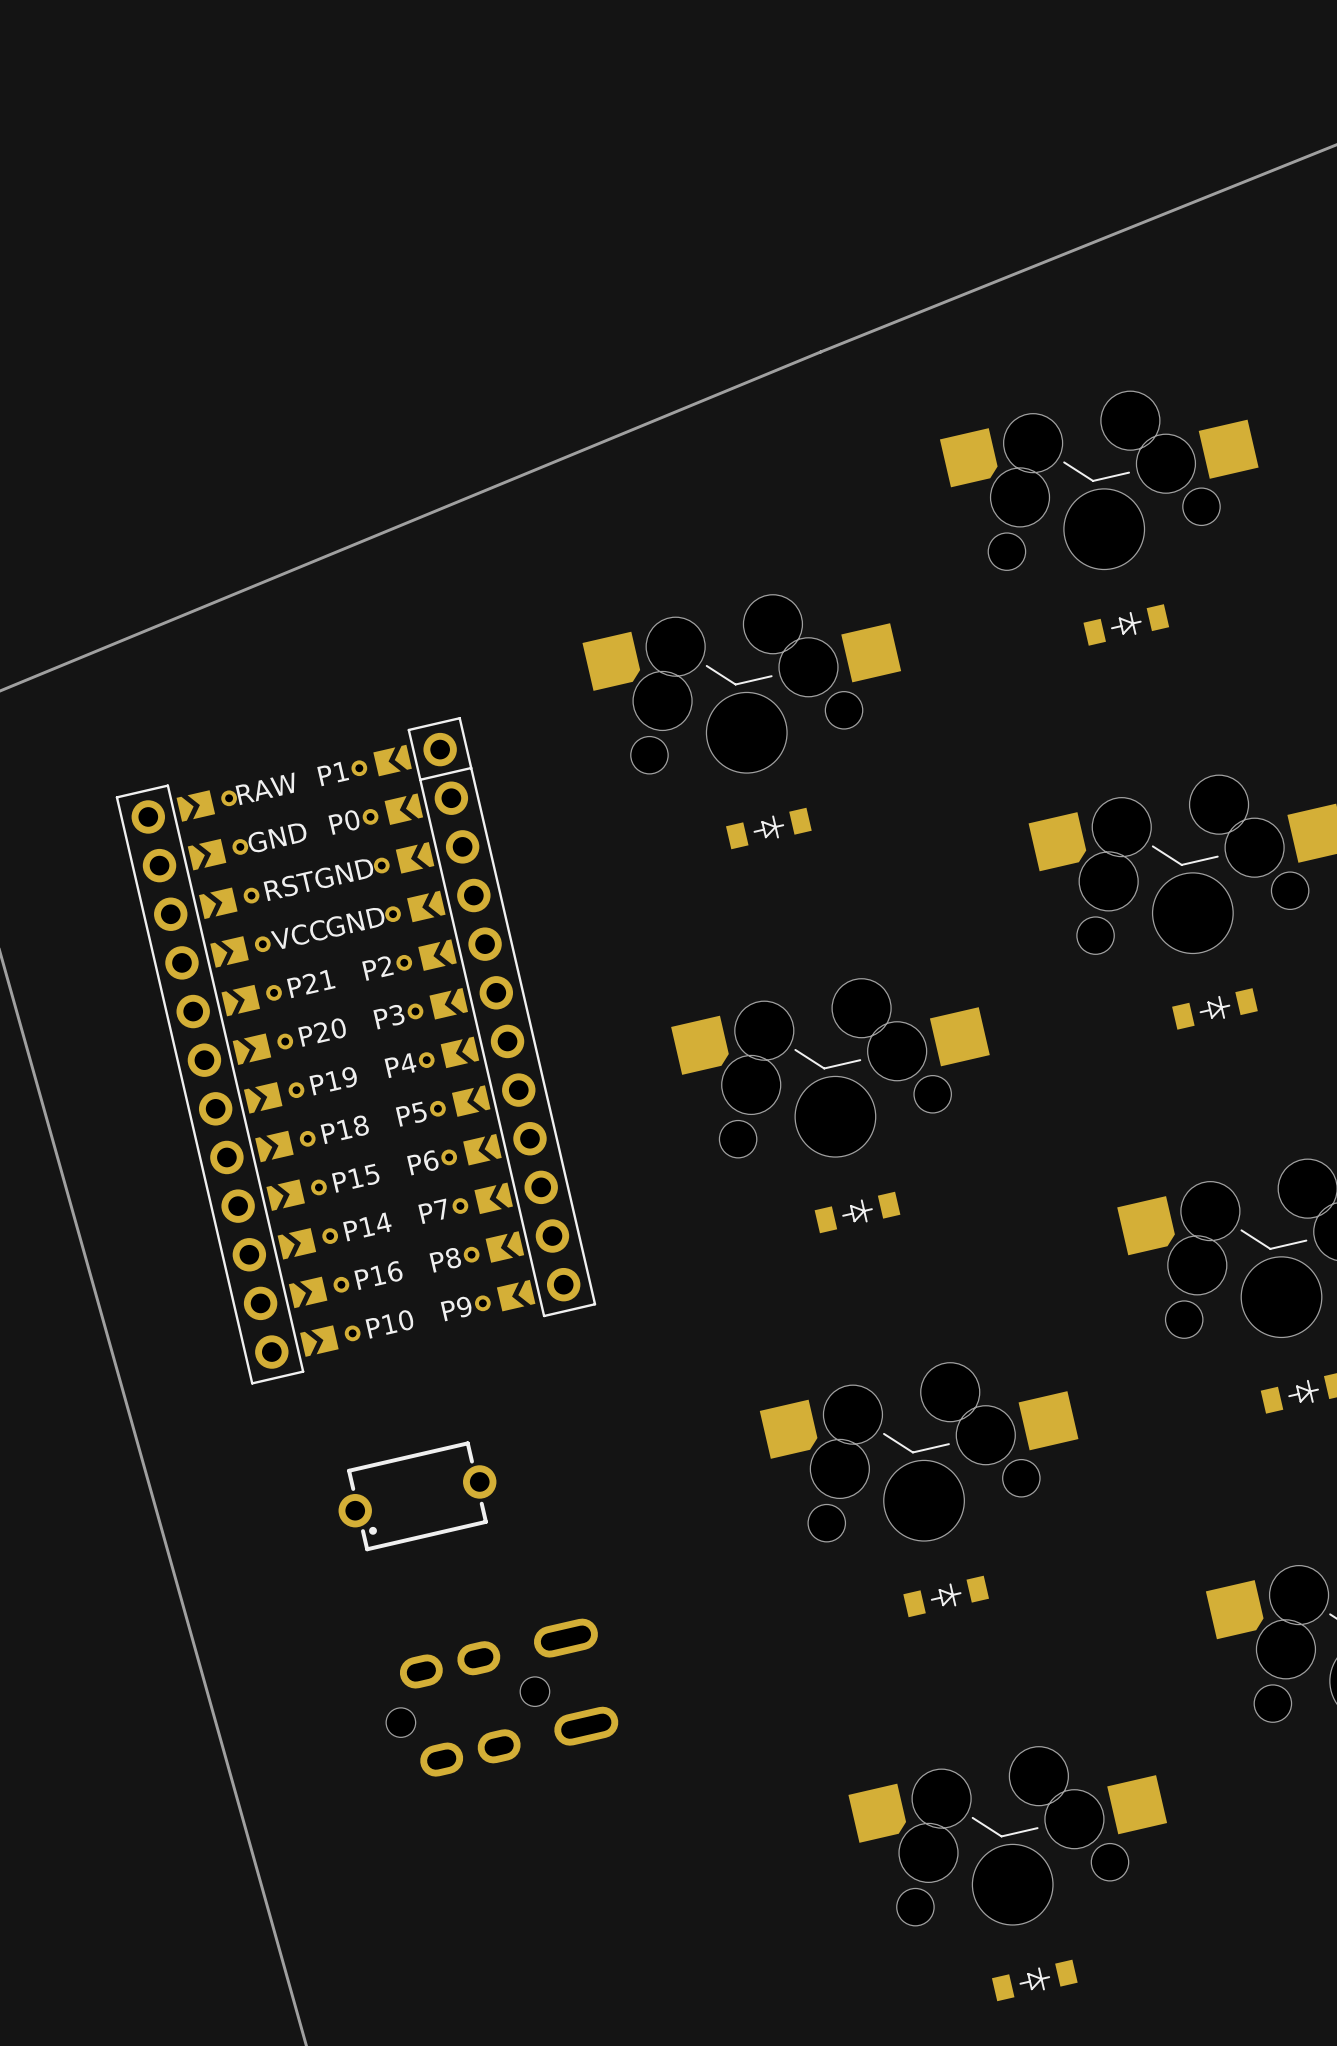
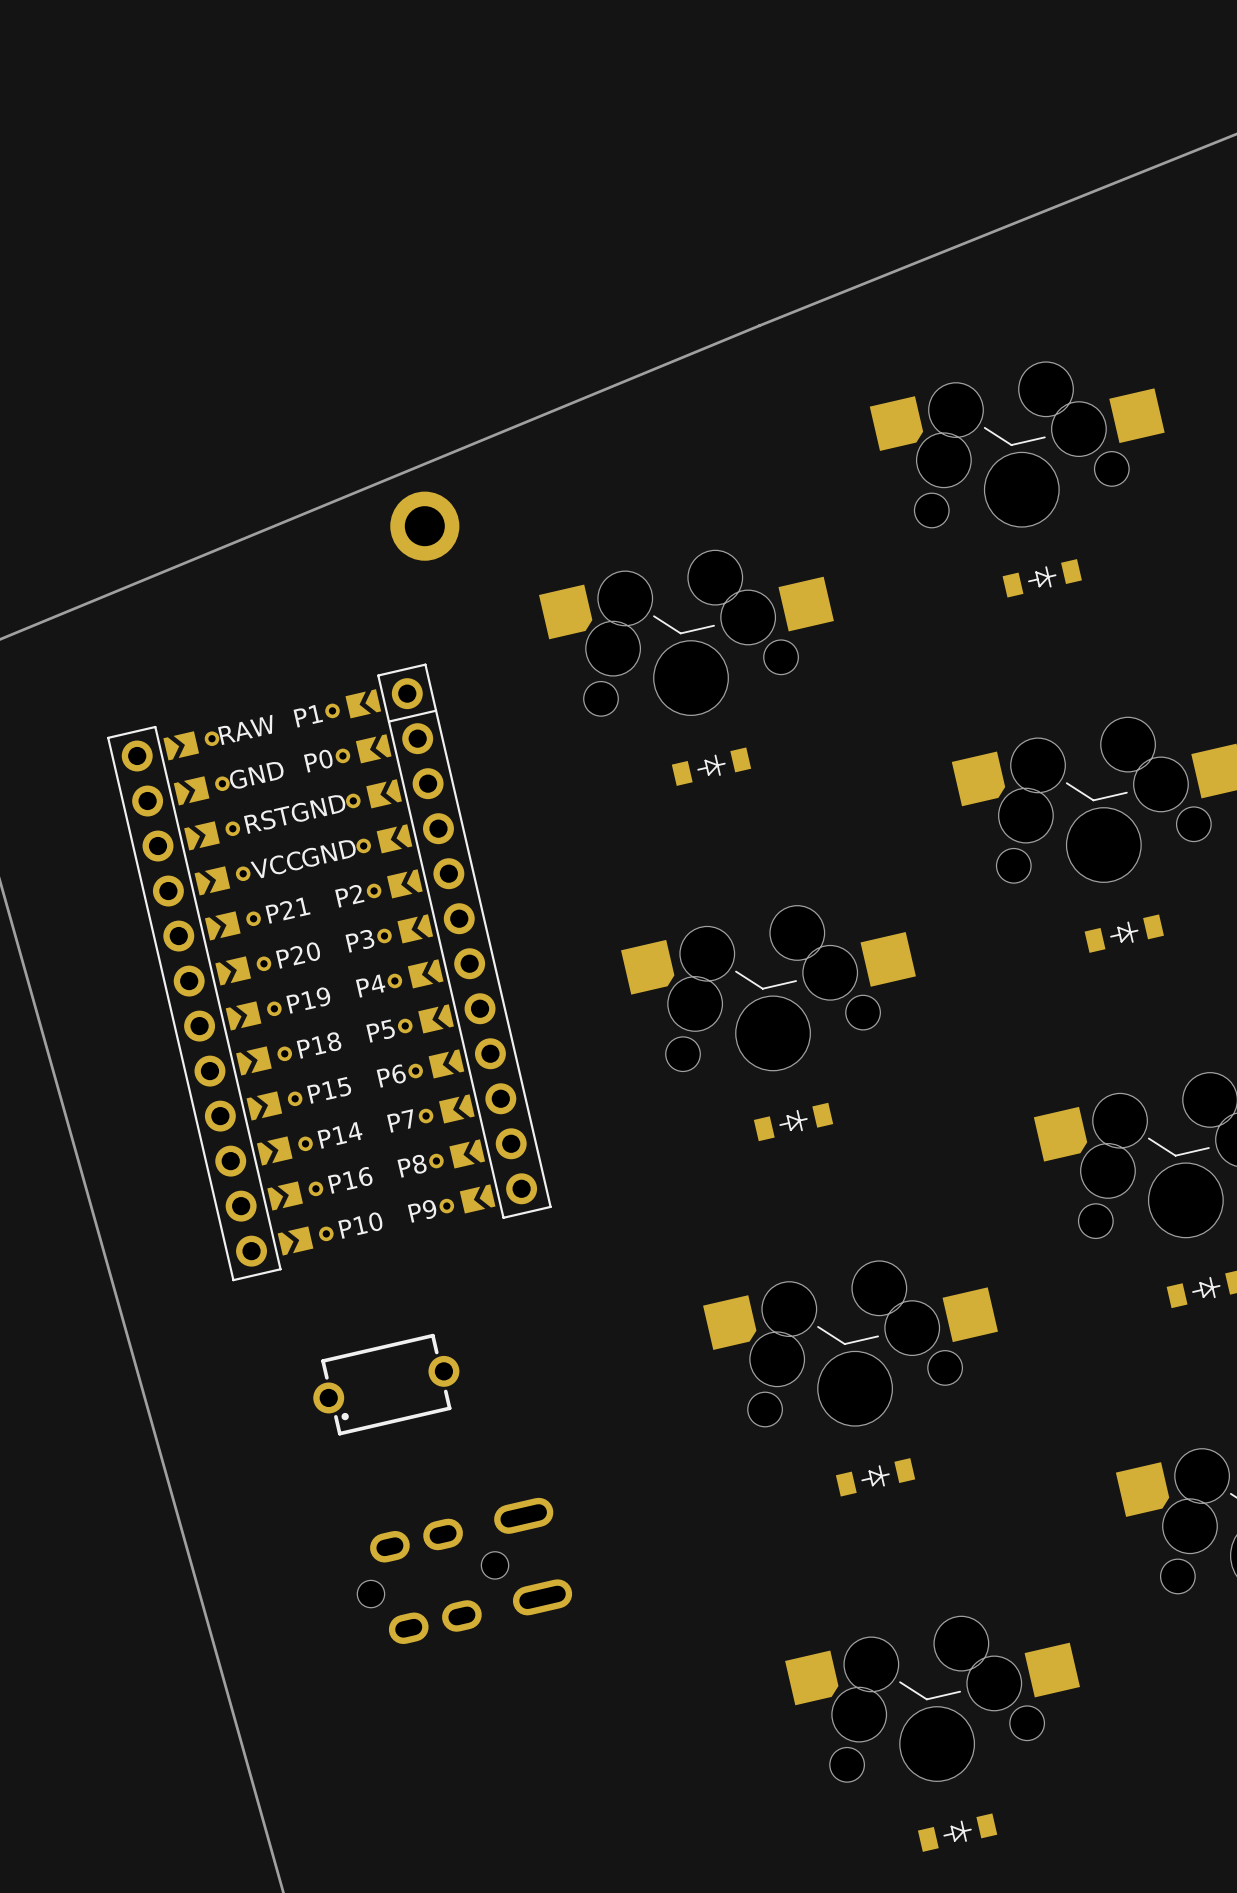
part: none -> (424, 526)

